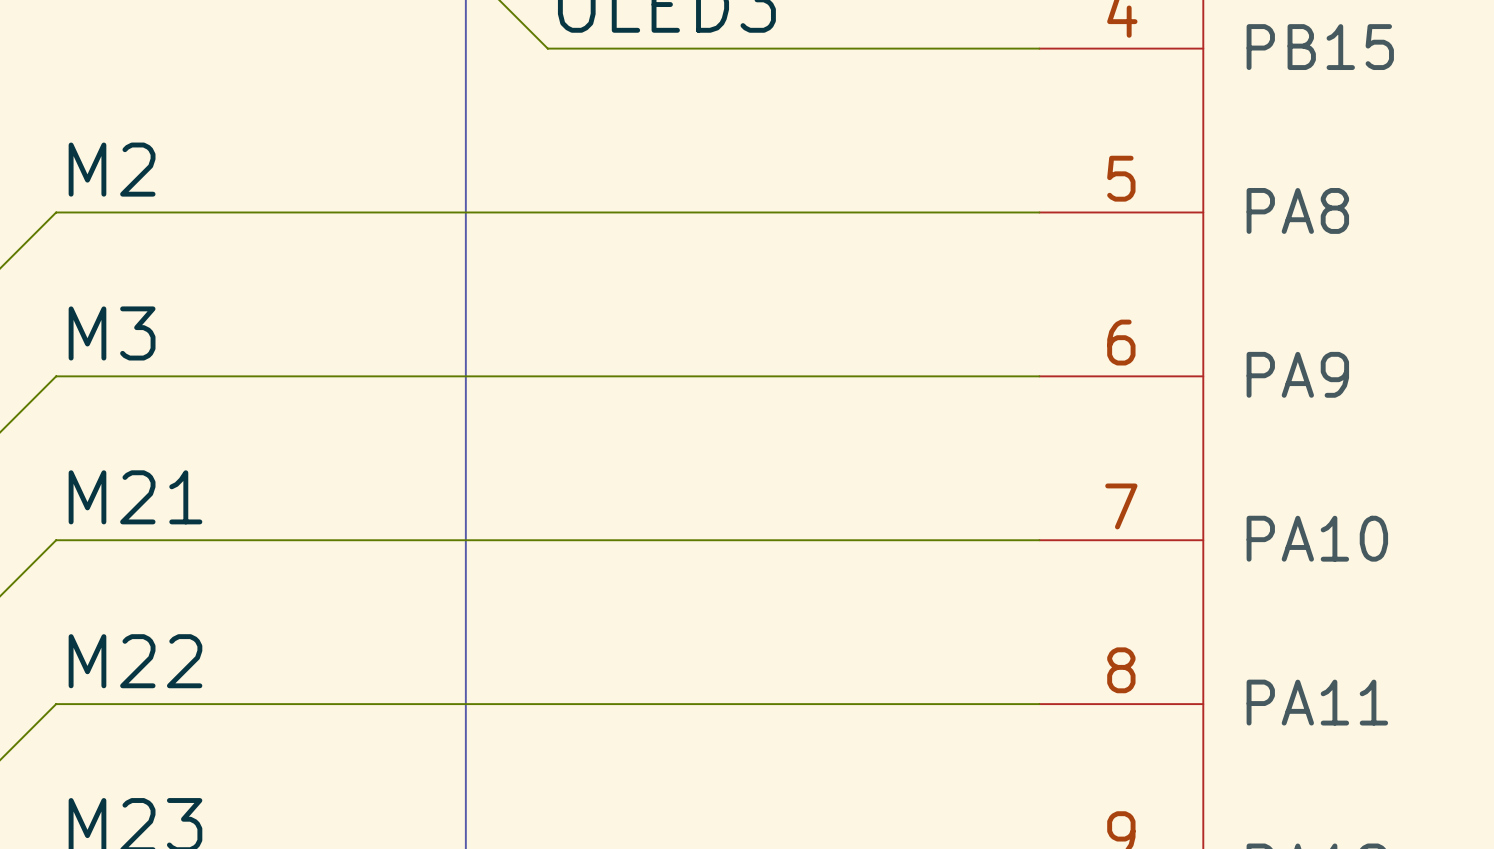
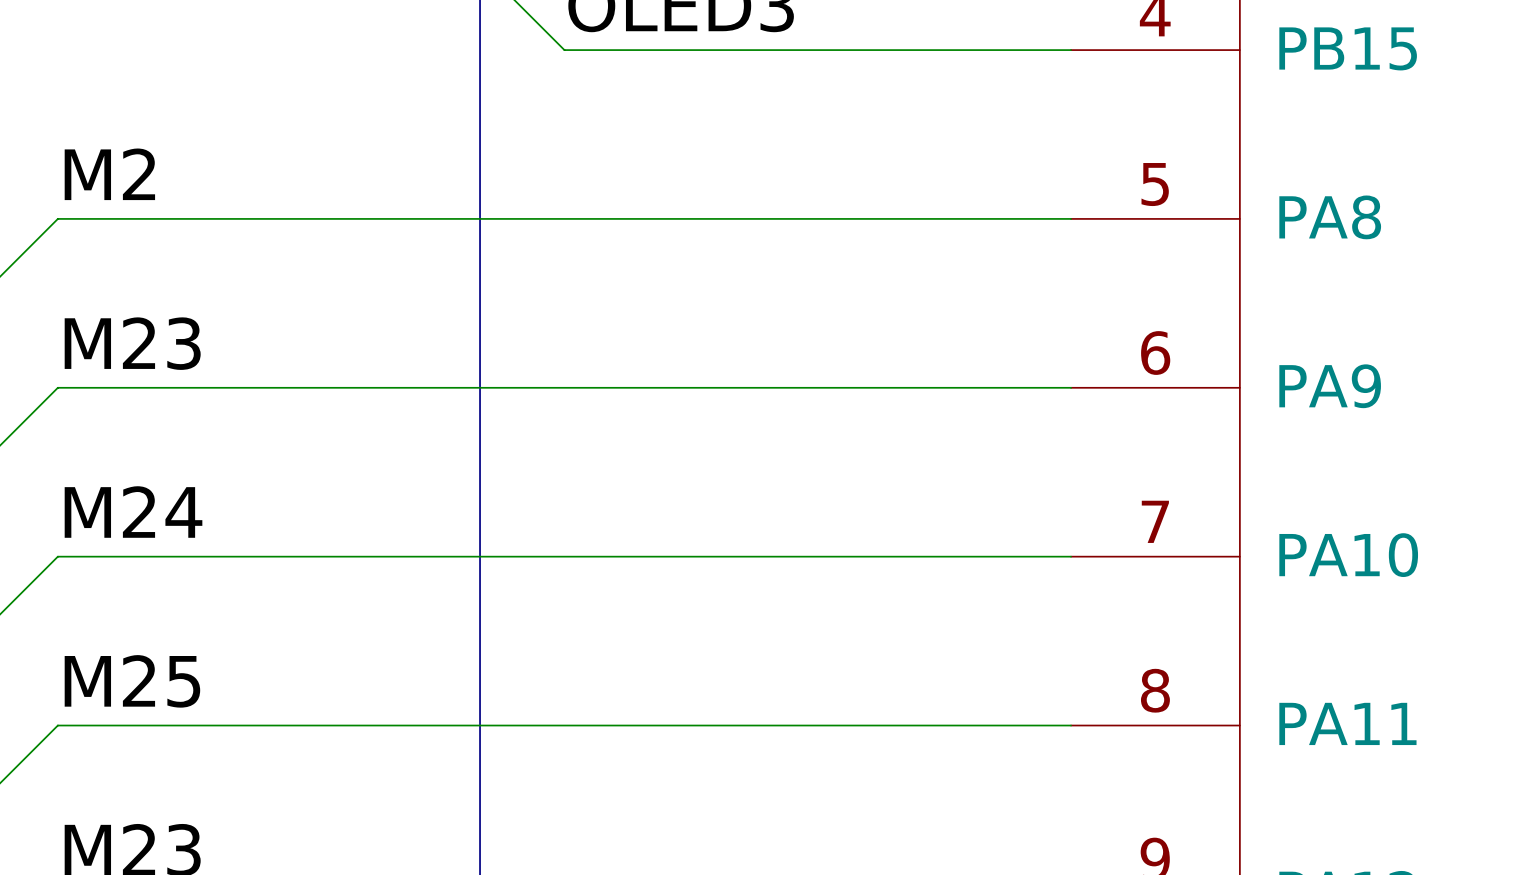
label: M3 (112, 333) -> M23 (132, 343)
label: M21 (135, 497) -> M24 (133, 512)
label: M22 (135, 661) -> M25 (132, 681)

